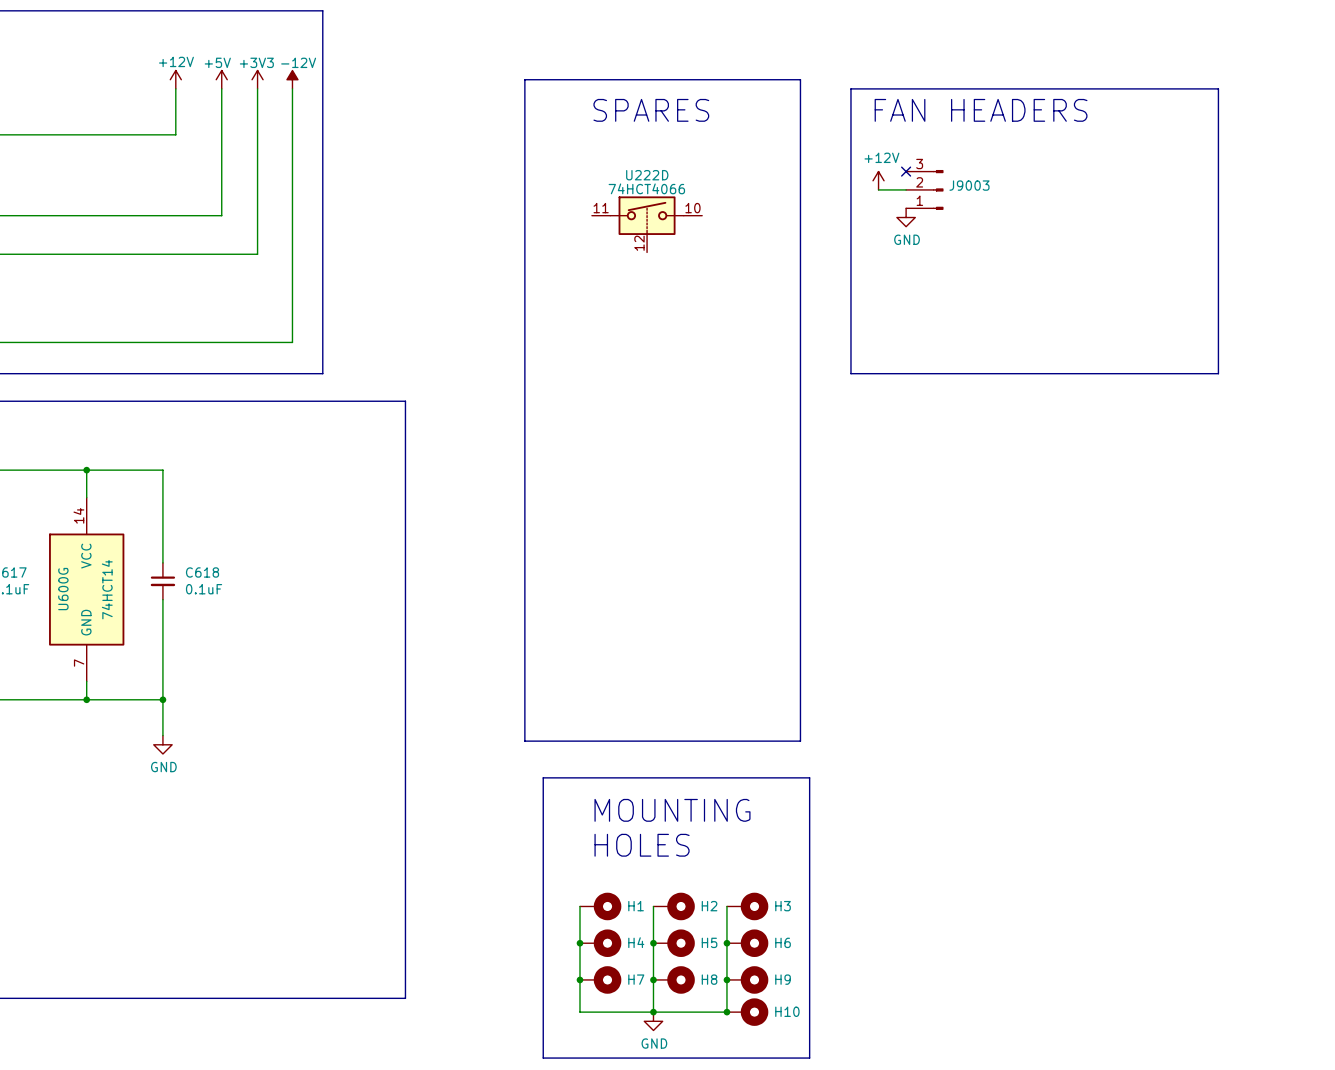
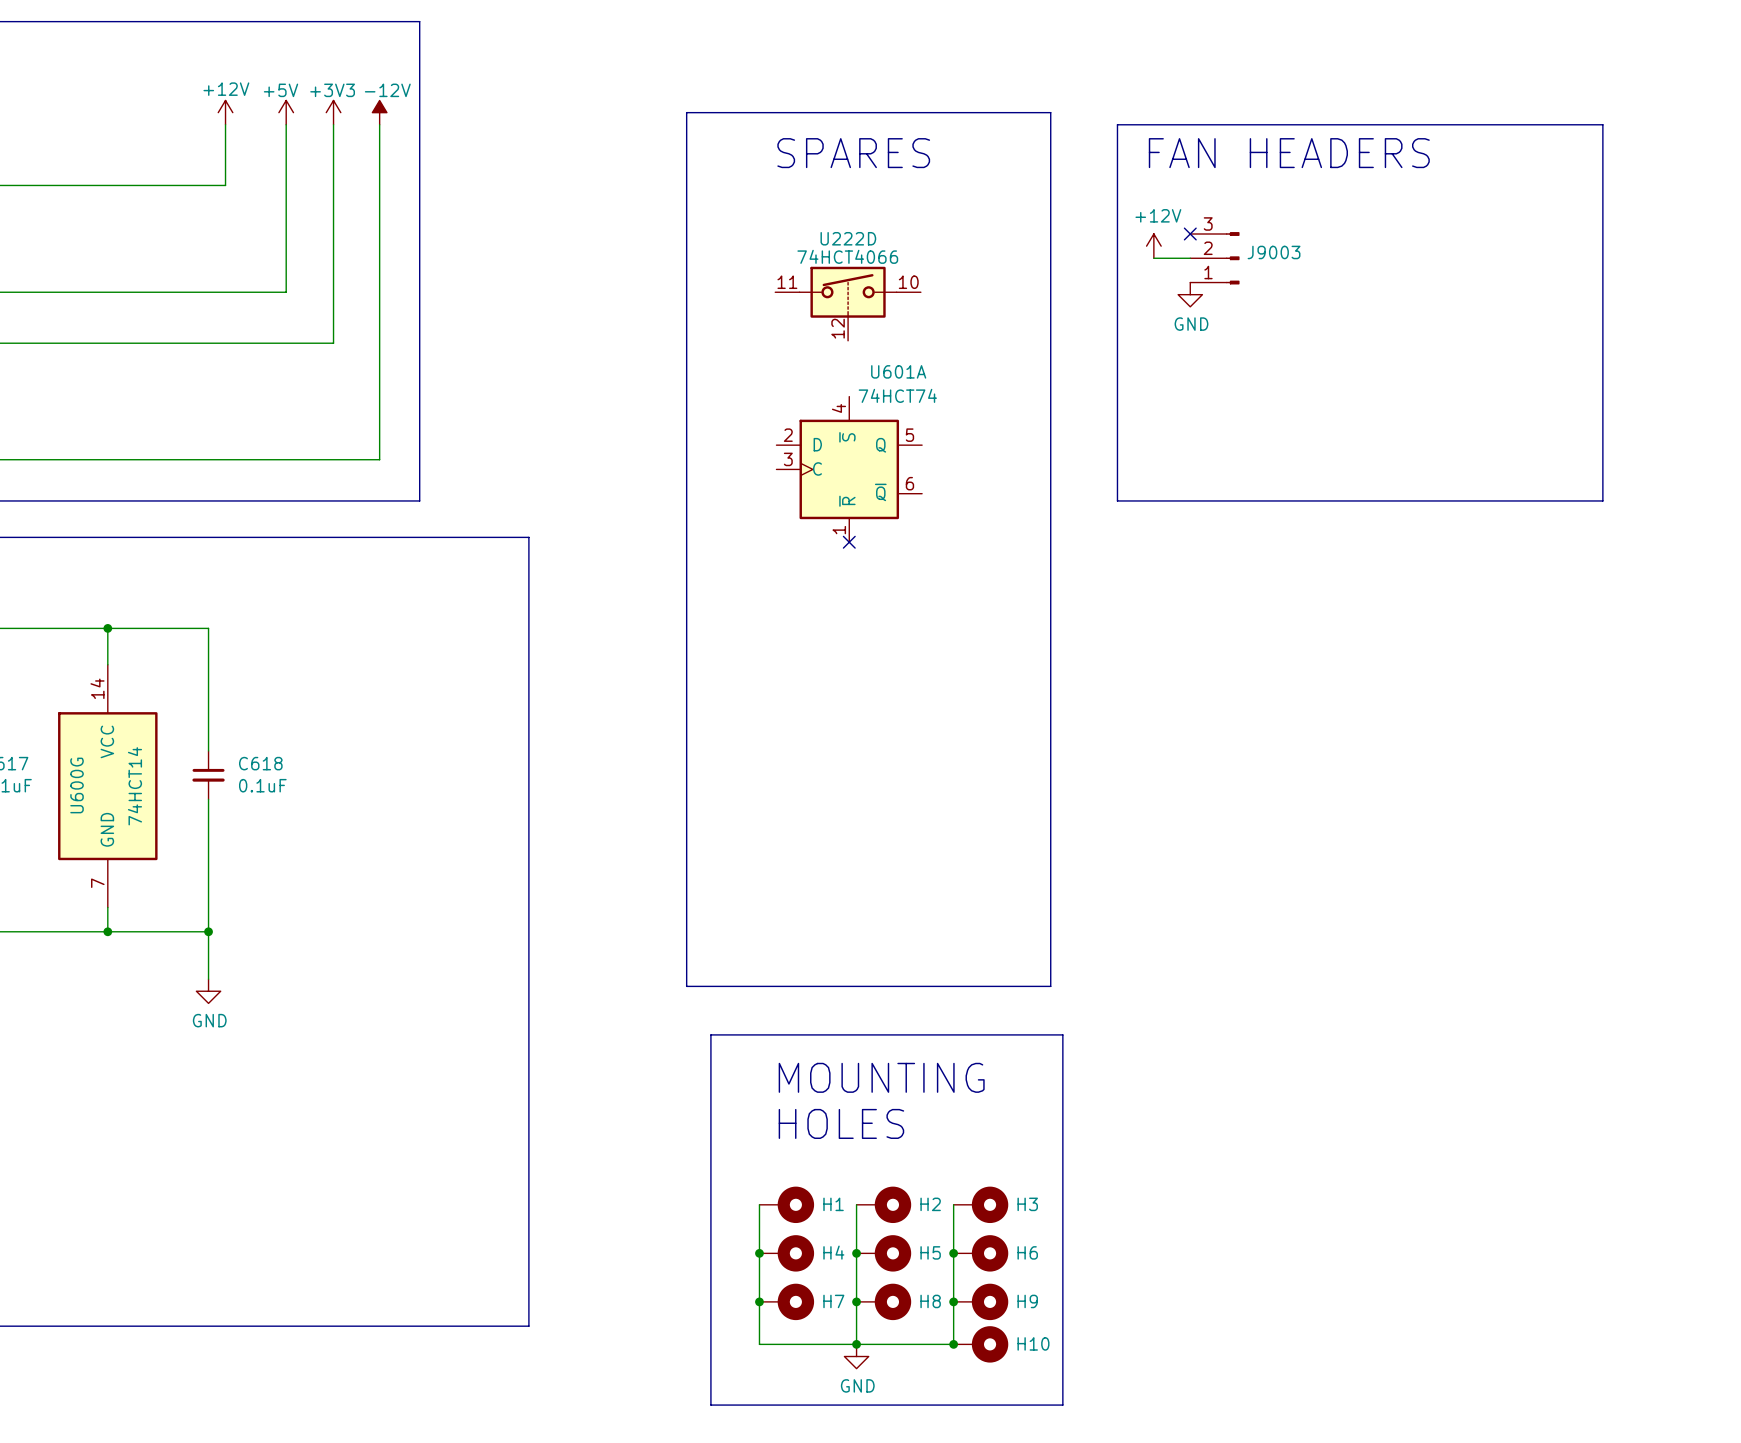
U601A: none -> 74HCT74 (849, 469)
no-connect mark: none -> (849, 542)

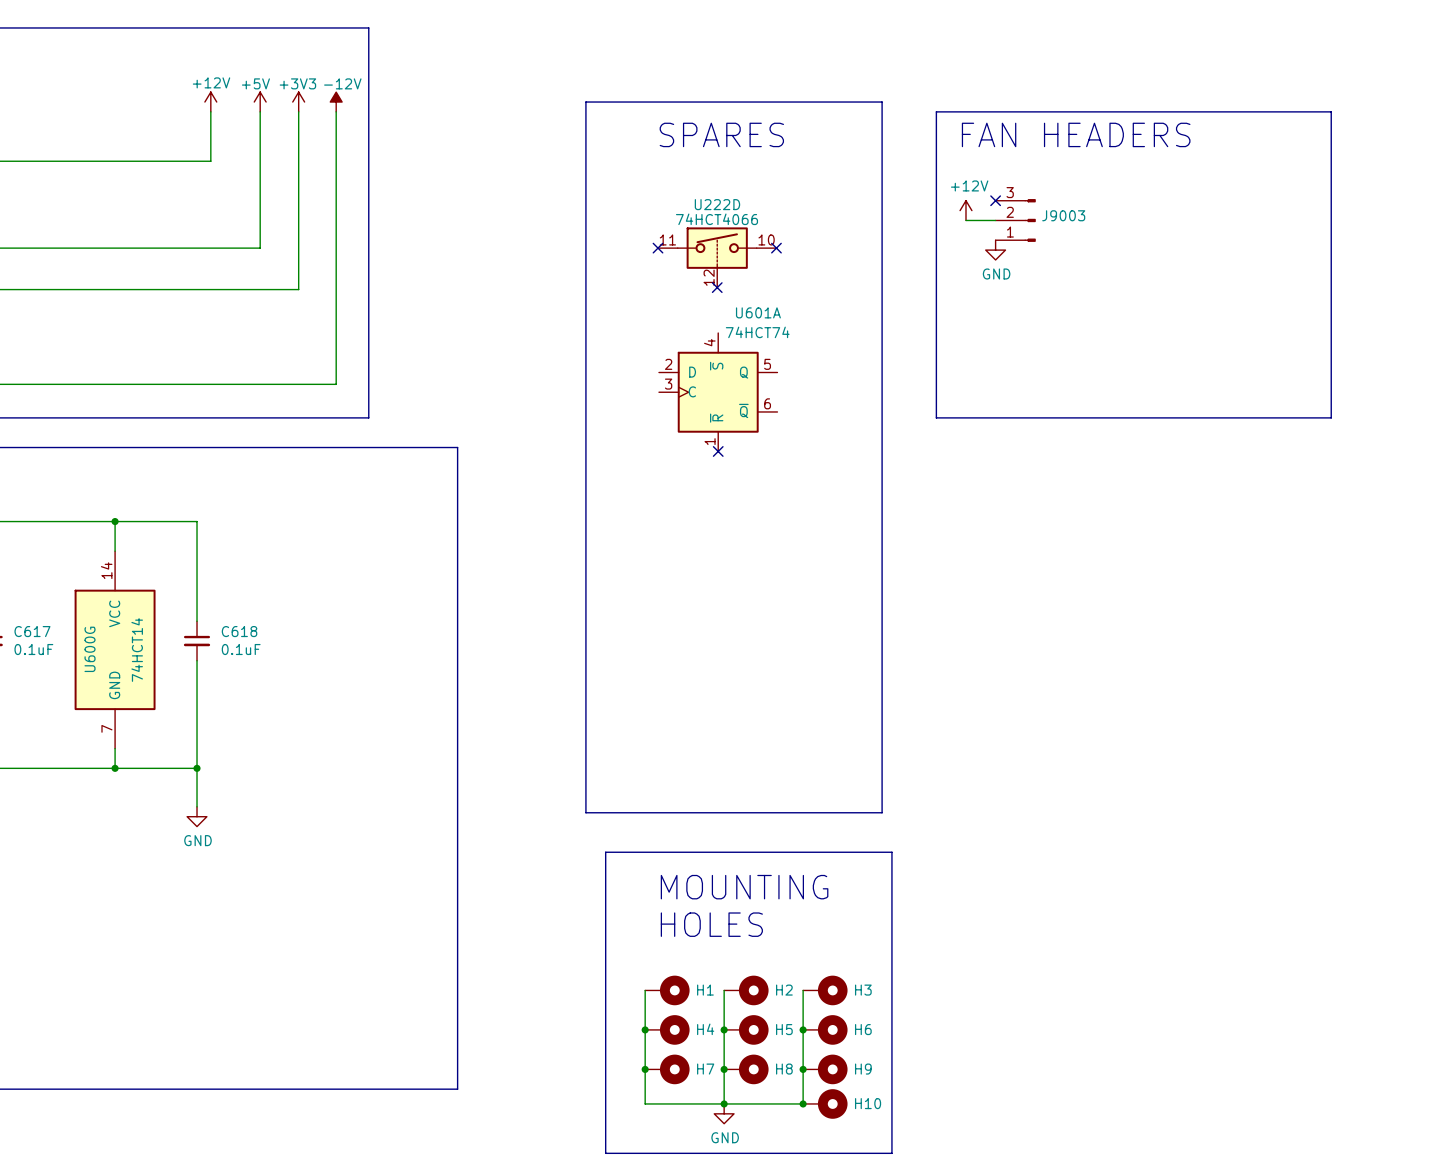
no-connect mark: none -> (658, 248)
no-connect mark: none -> (776, 248)
no-connect mark: none -> (717, 287)

